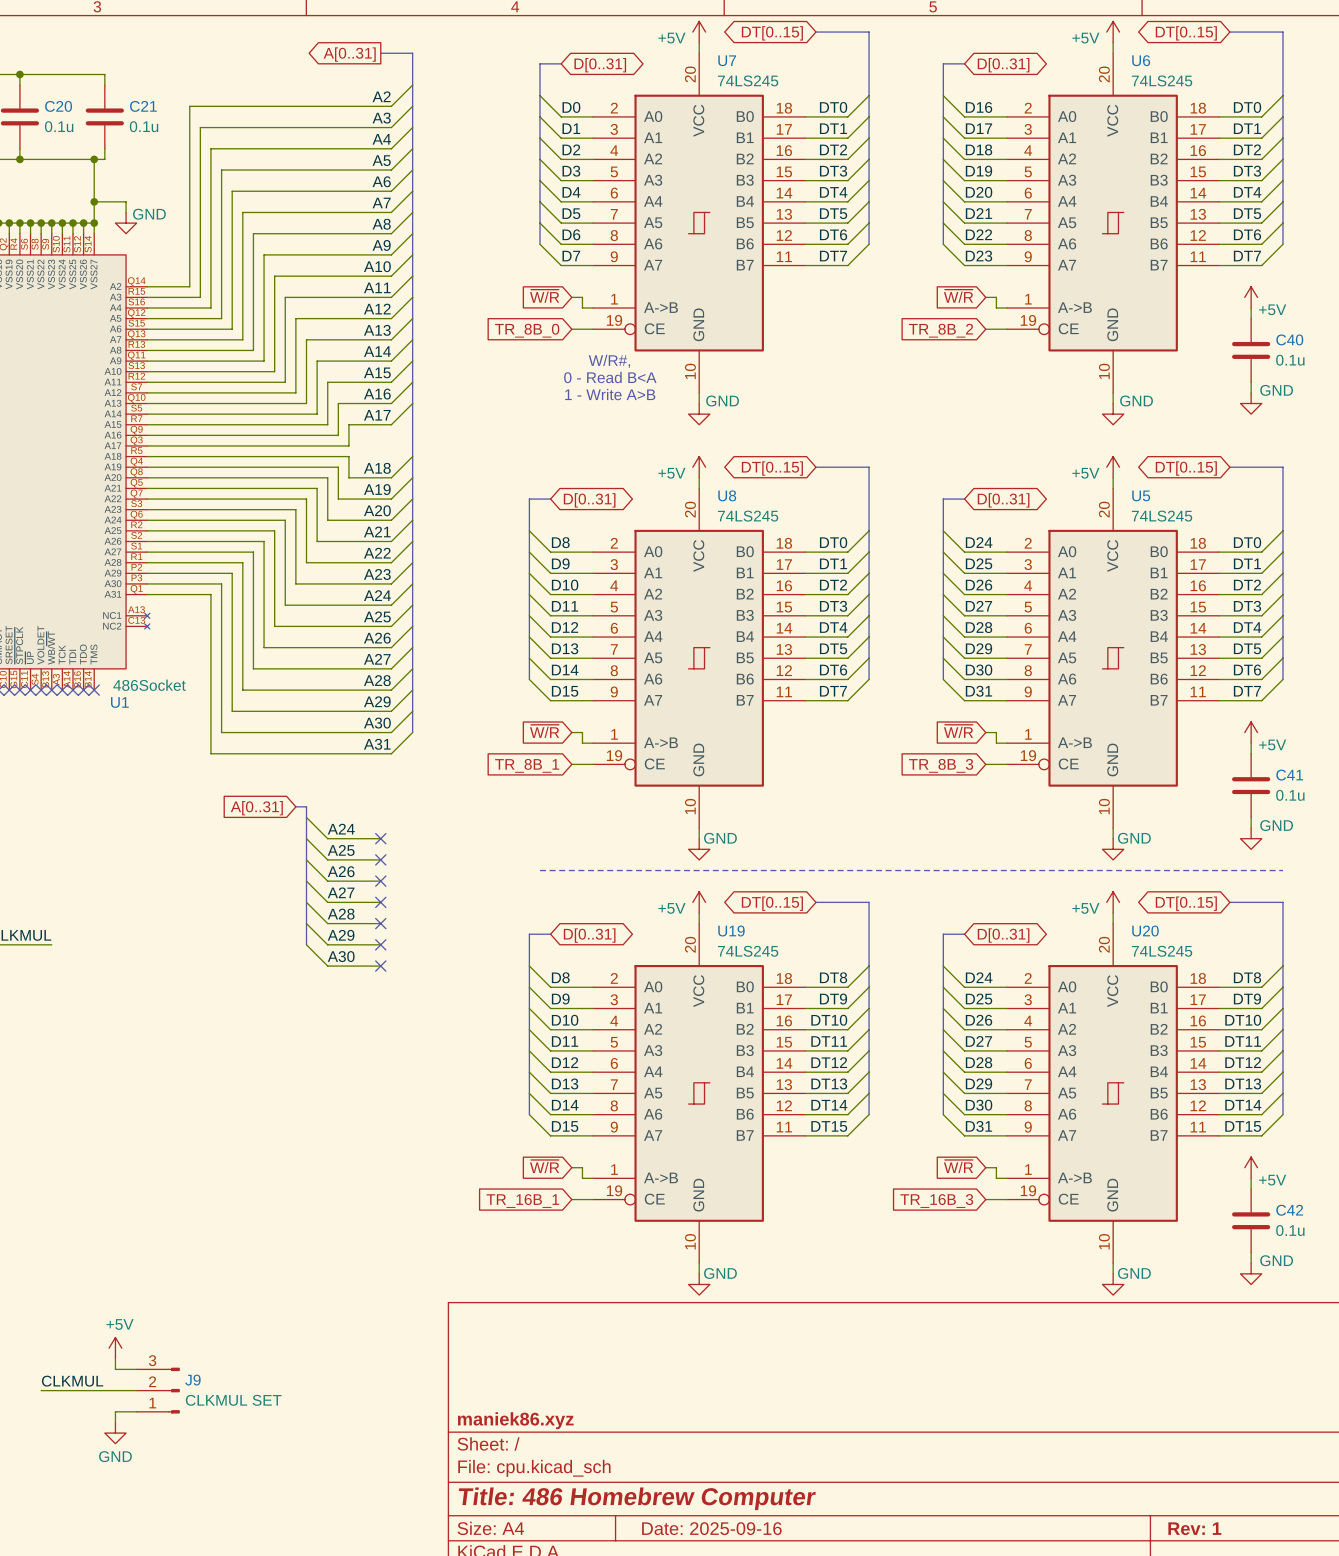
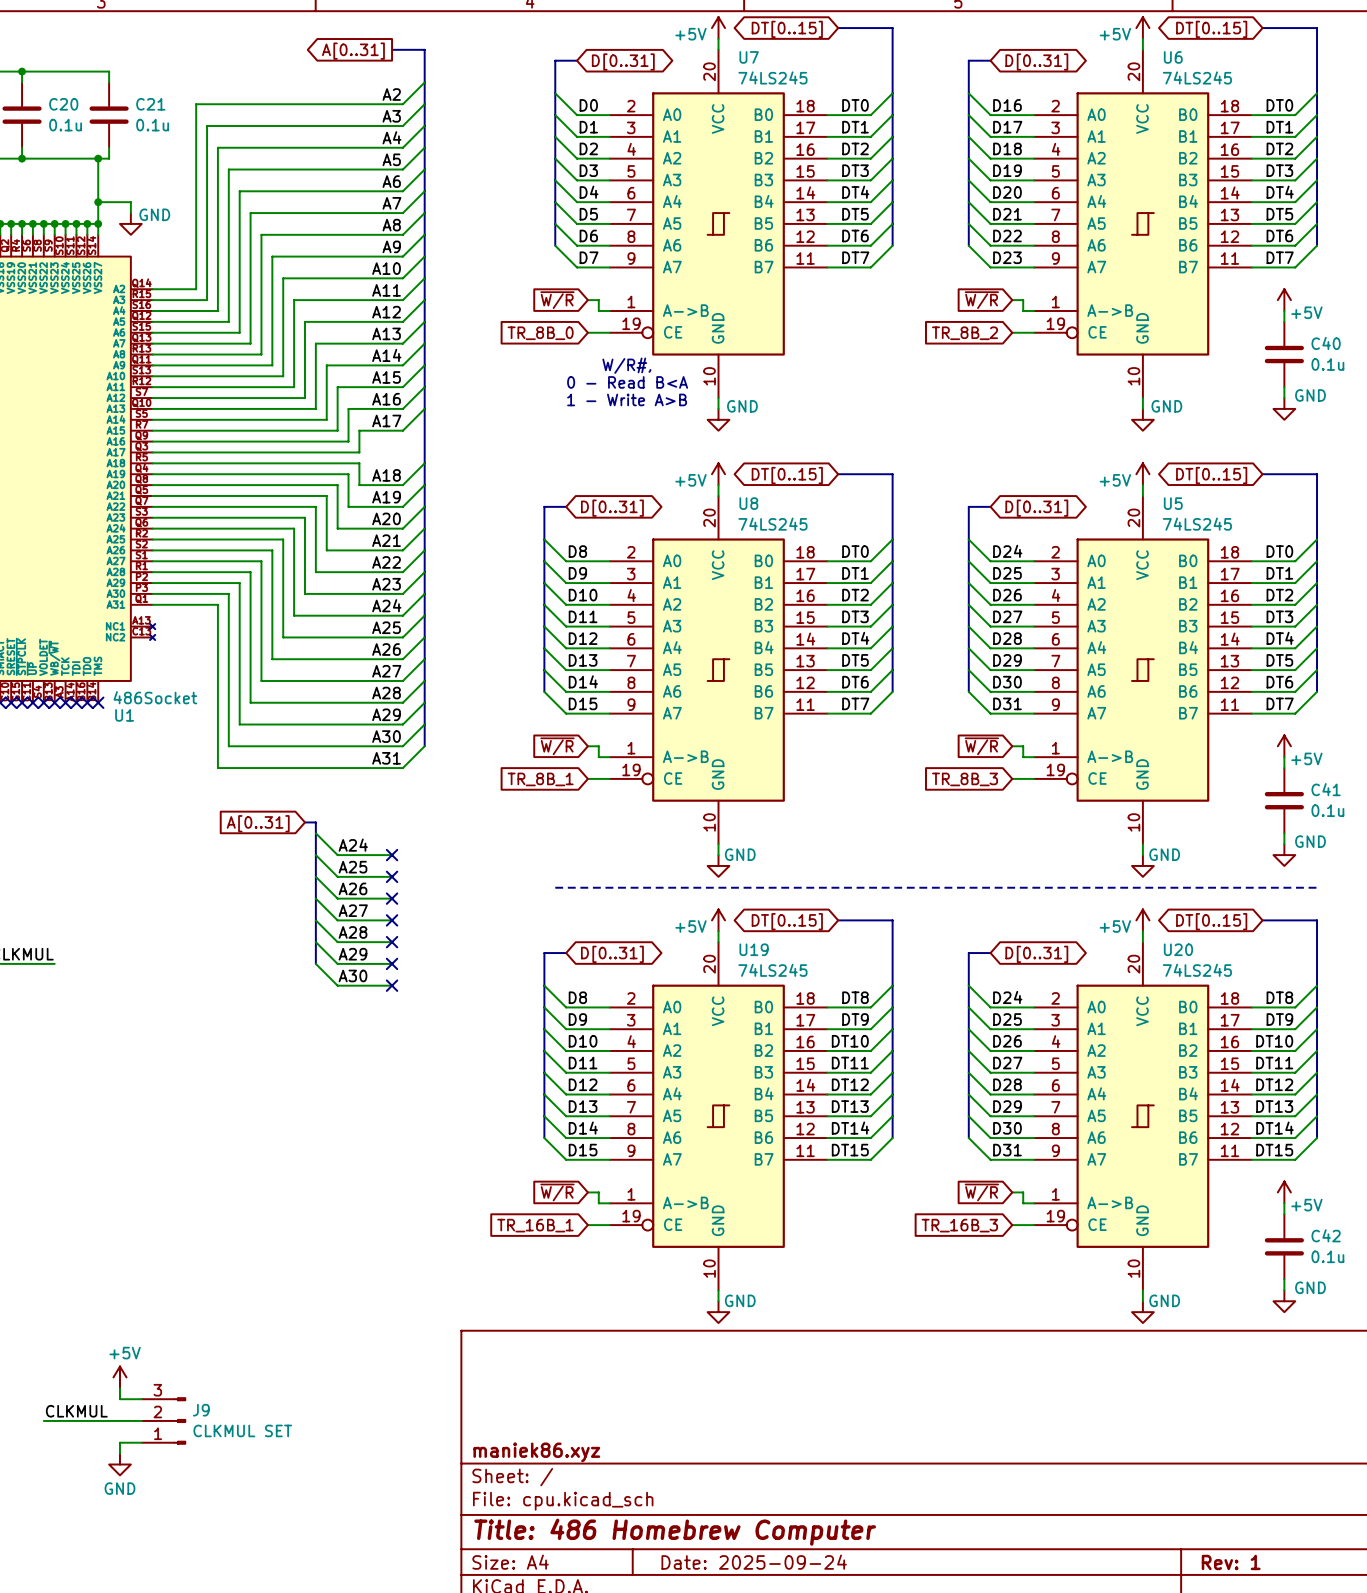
title block: Date: 2025-09-16 (711, 1528) -> Date: 2025-09-24 (754, 1562)

